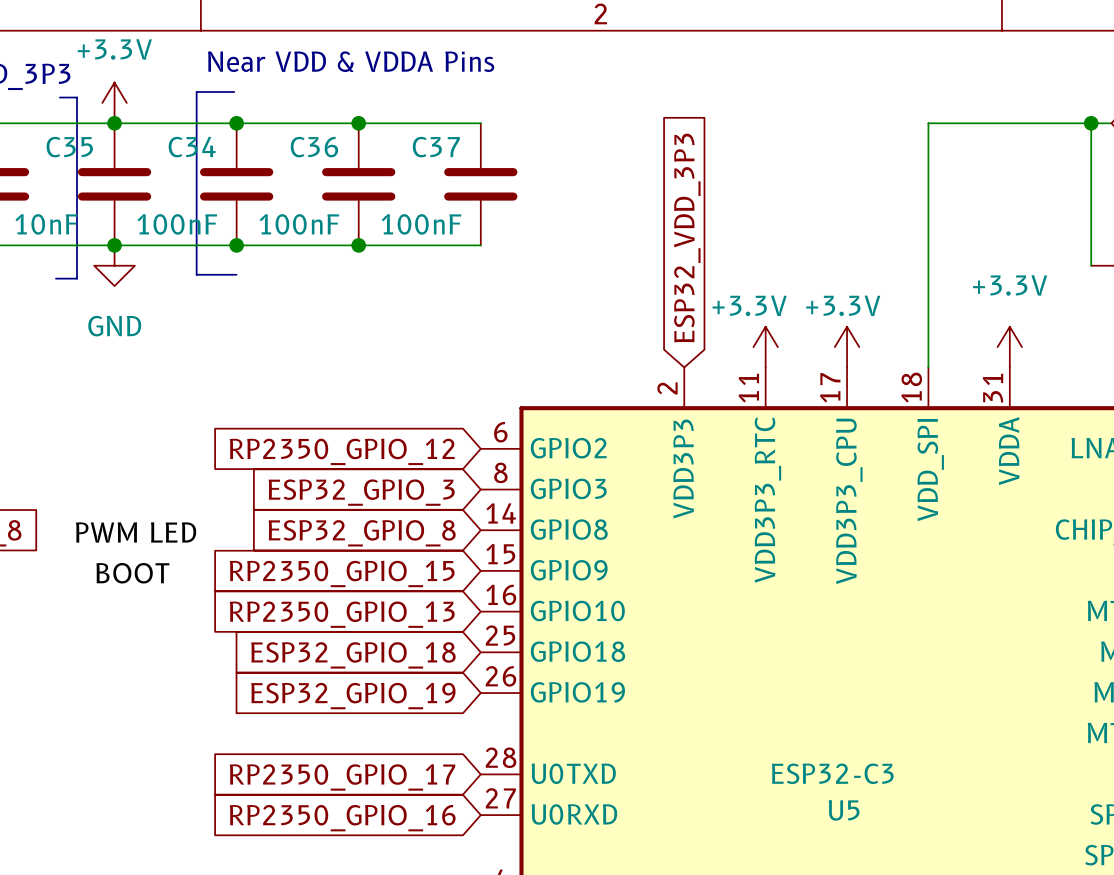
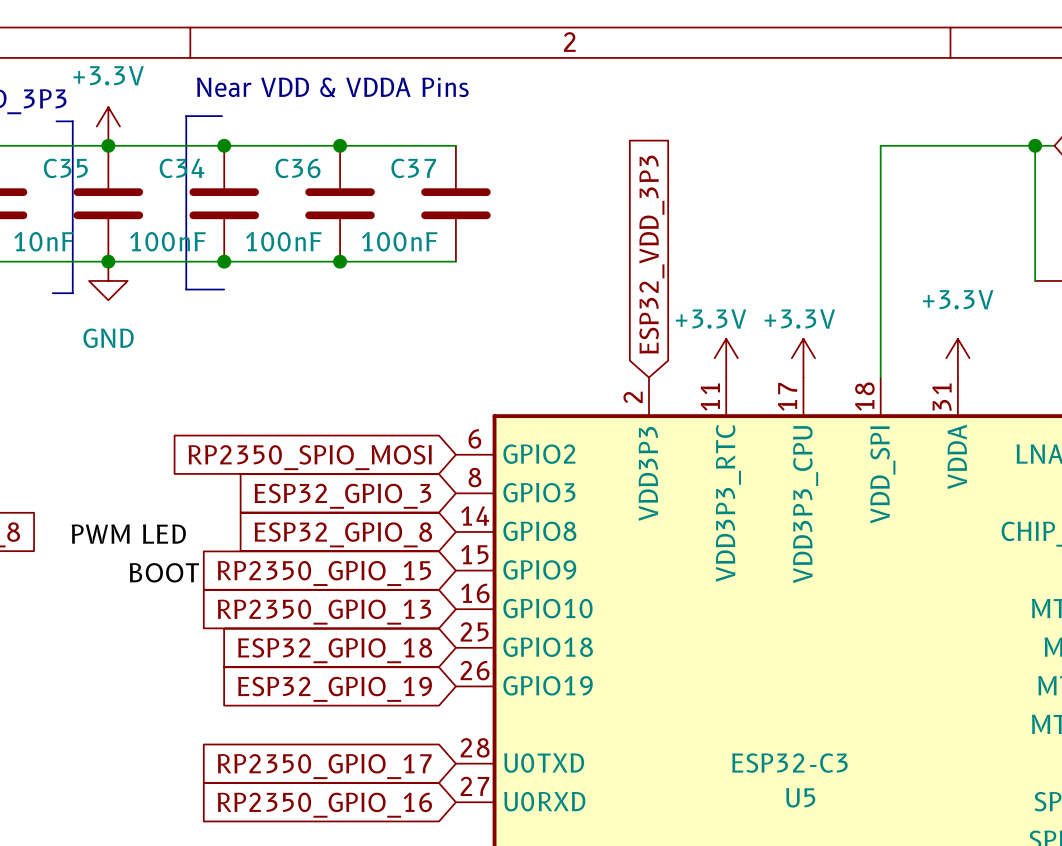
global label: RP2350_GPIO_12 (342, 451) -> RP2350_SPIO_MOSI (310, 457)
label position: BOOT (132, 573) -> BOOT (164, 572)

